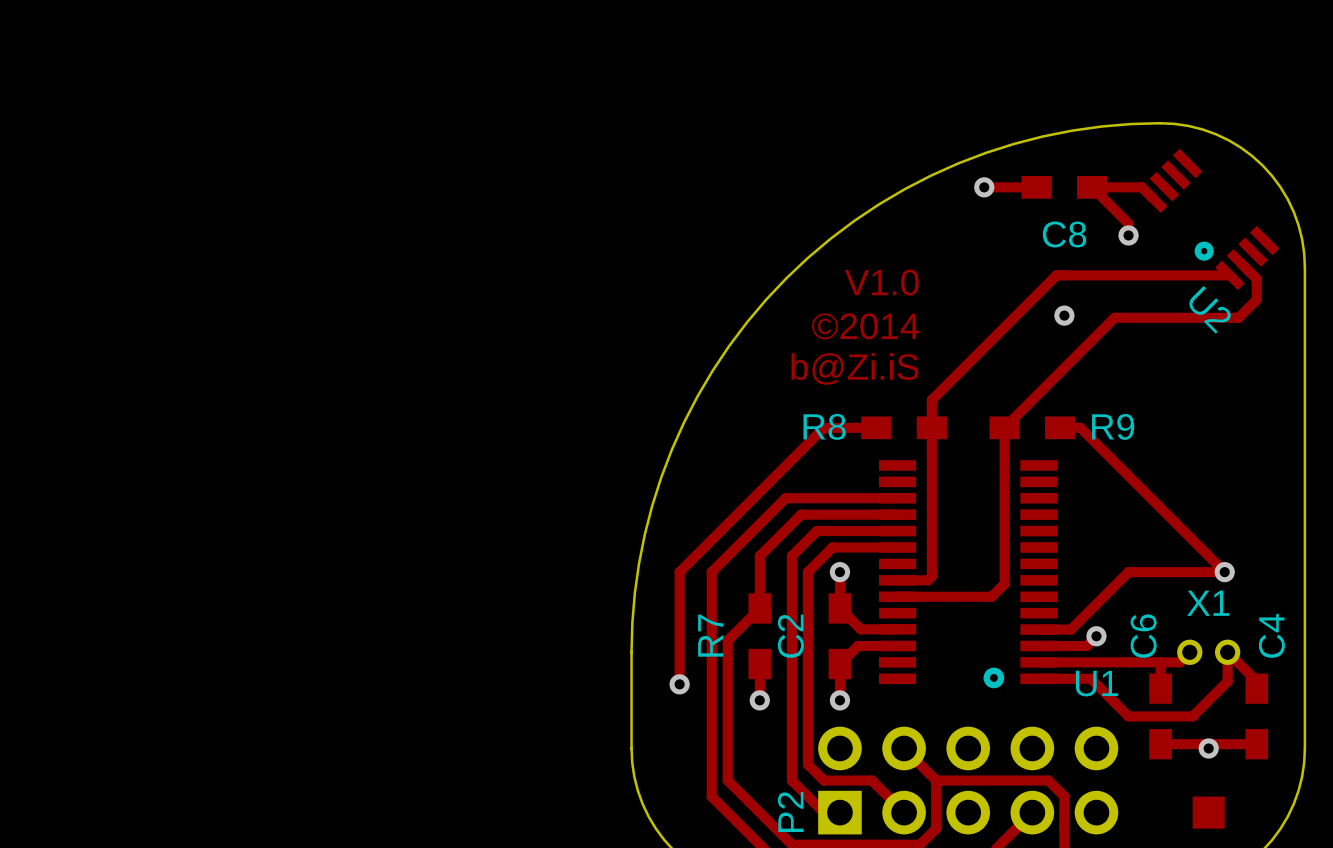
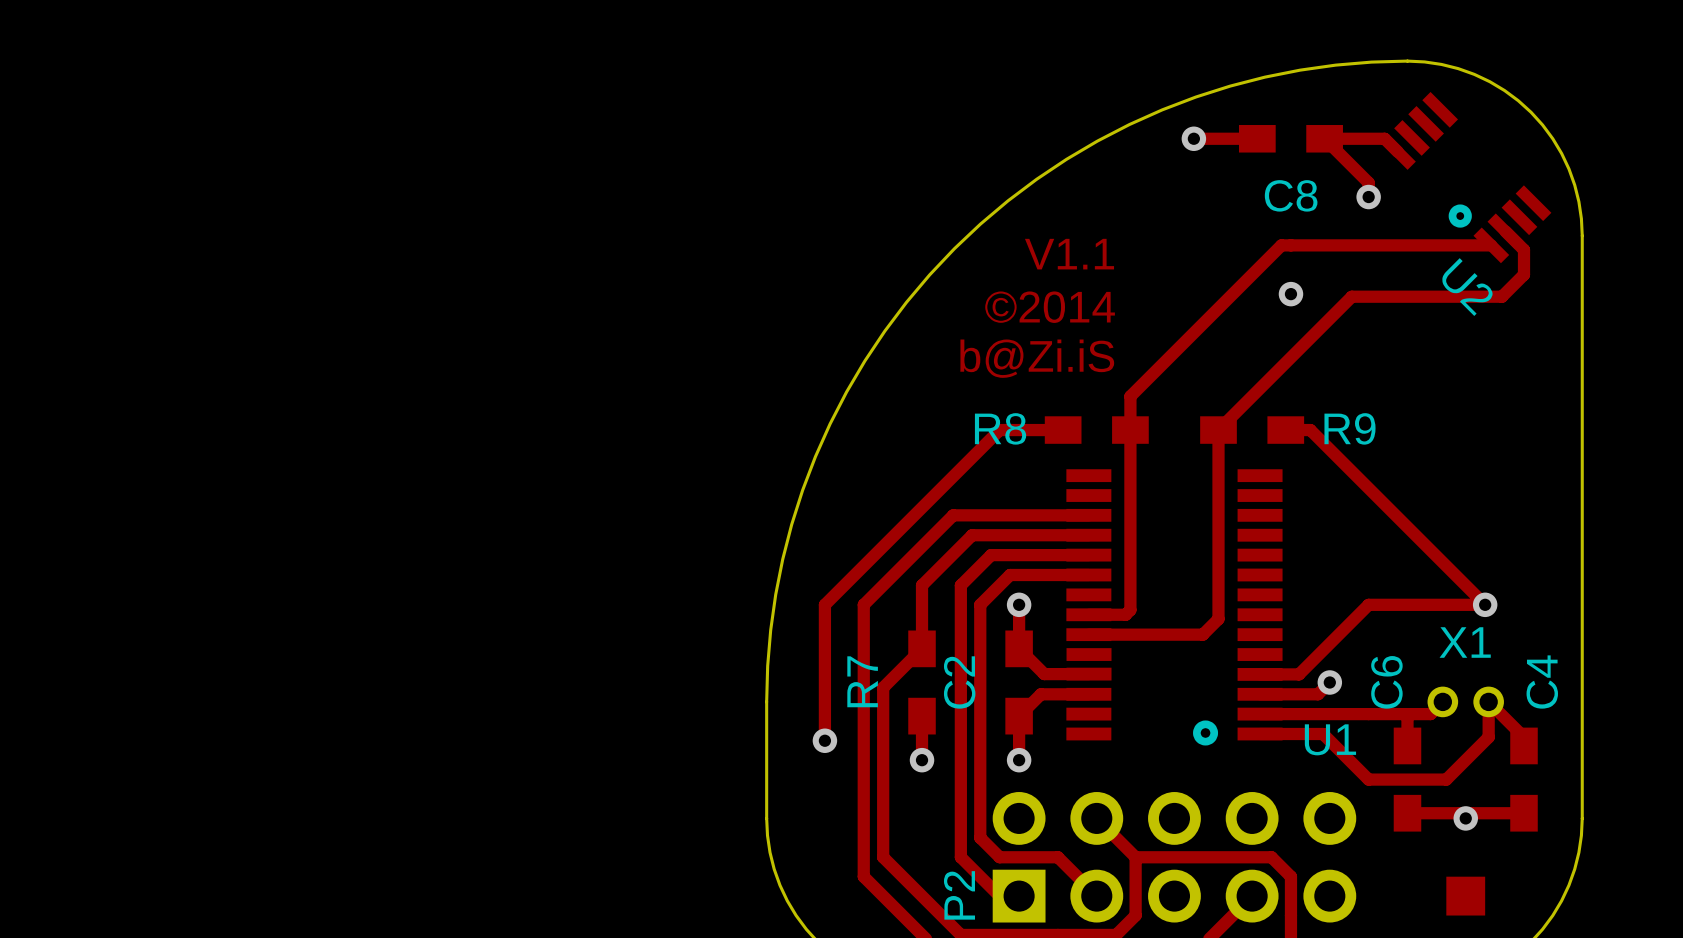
text: V1.0 (881, 282) -> V1.1 (1069, 254)

